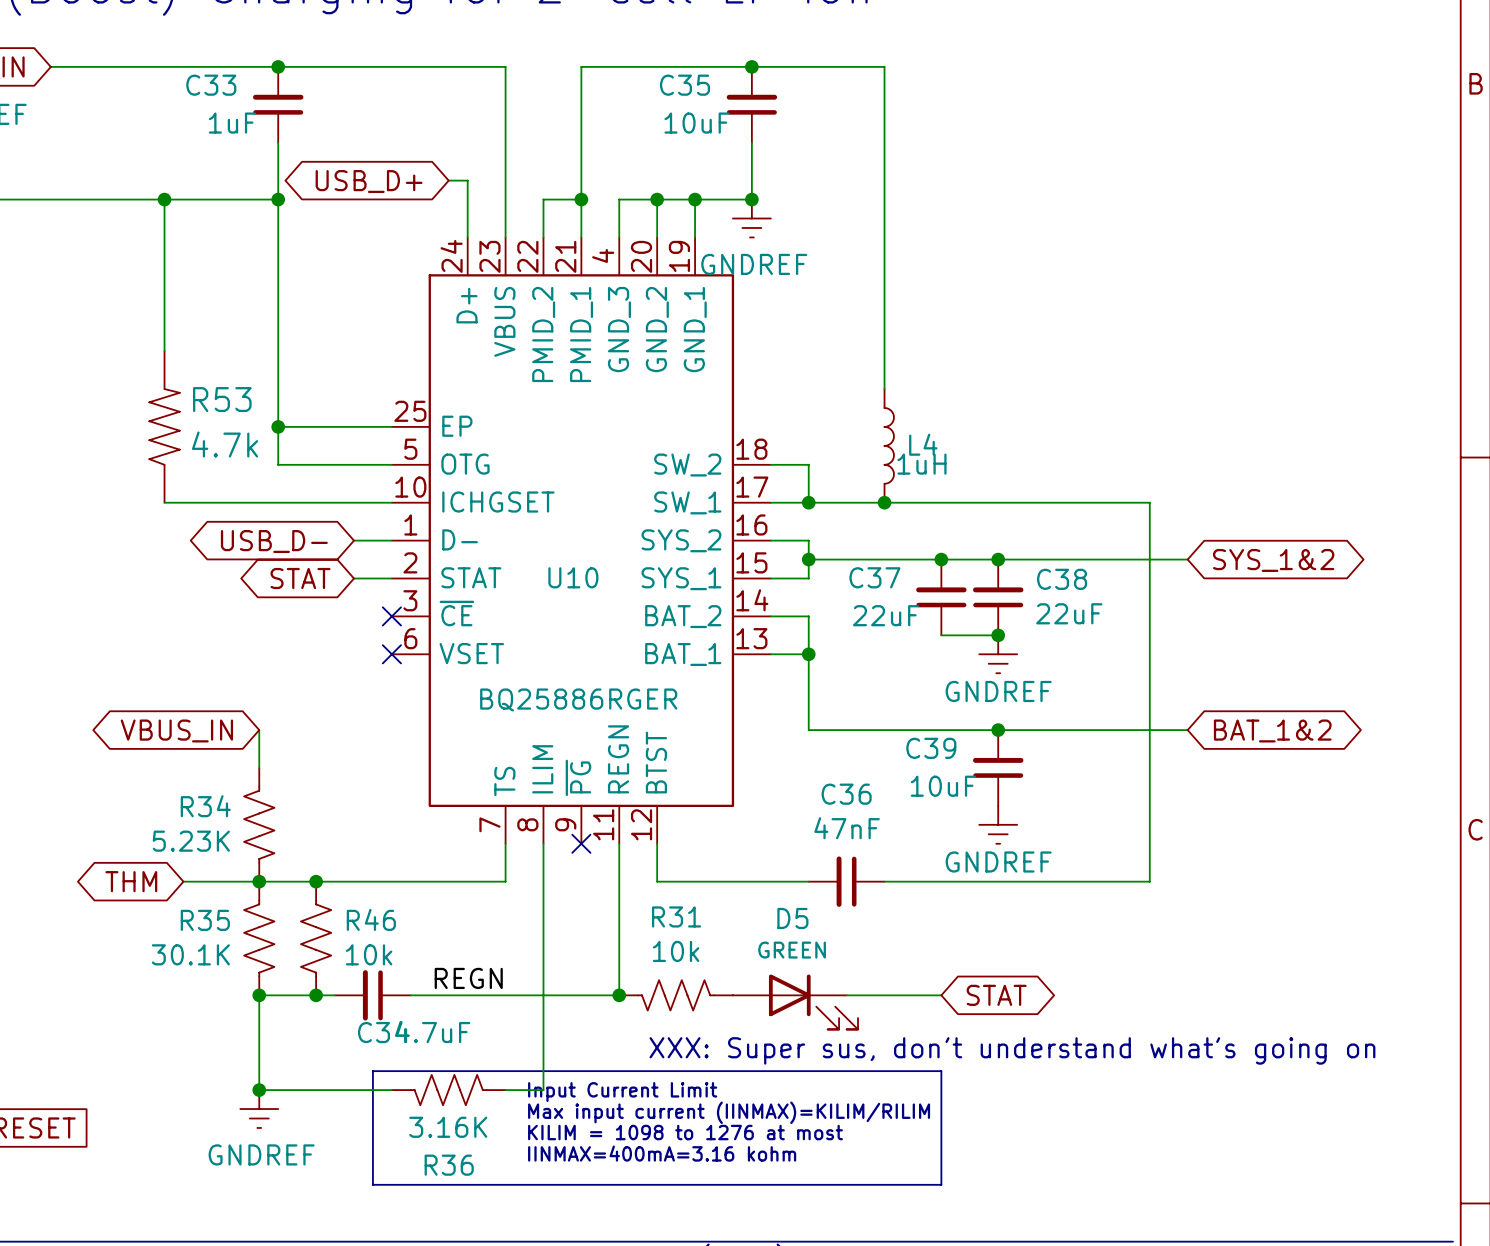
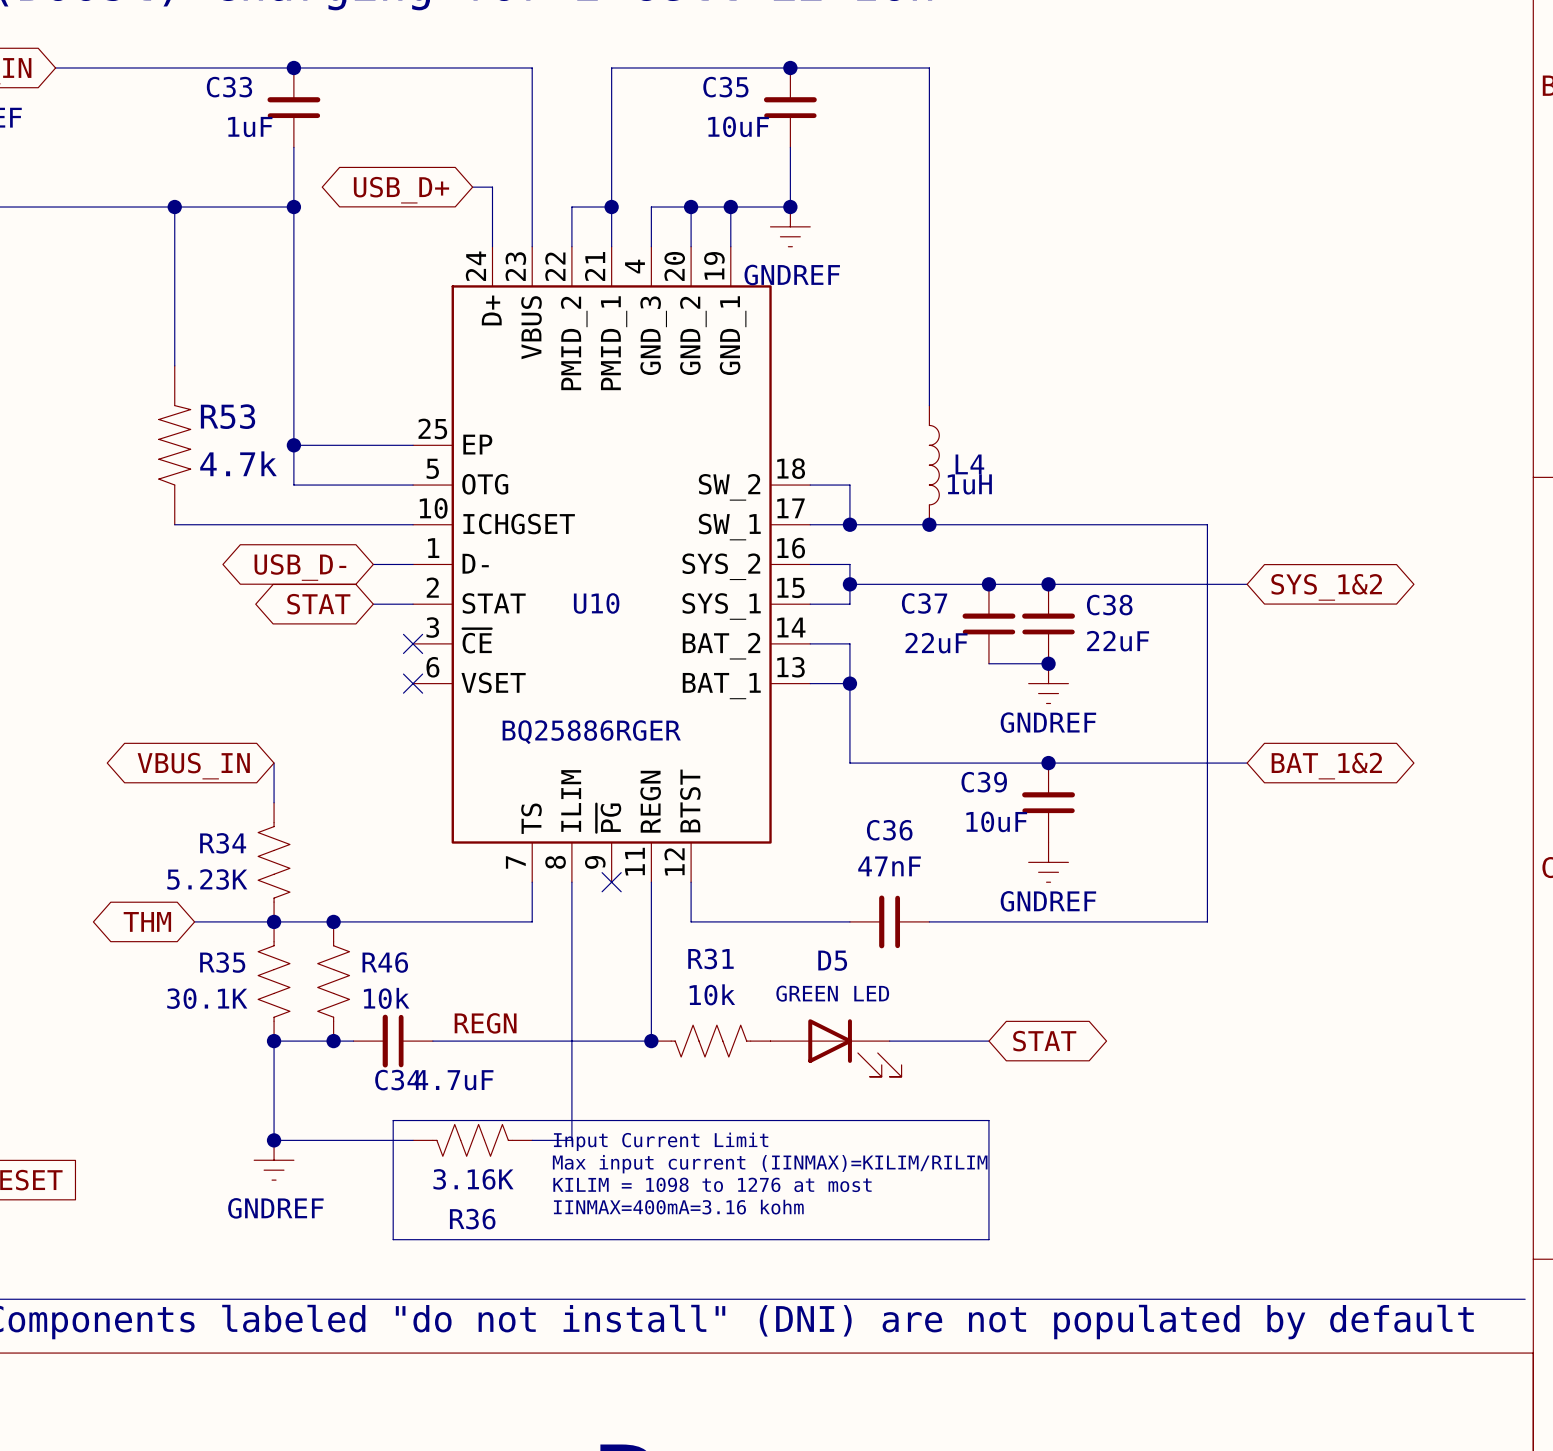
D5 value: GREEN (792, 950) -> GREEN LED (832, 993)
text: XXX: Super sus, don't understand what's going on (1012, 1050) -> none

